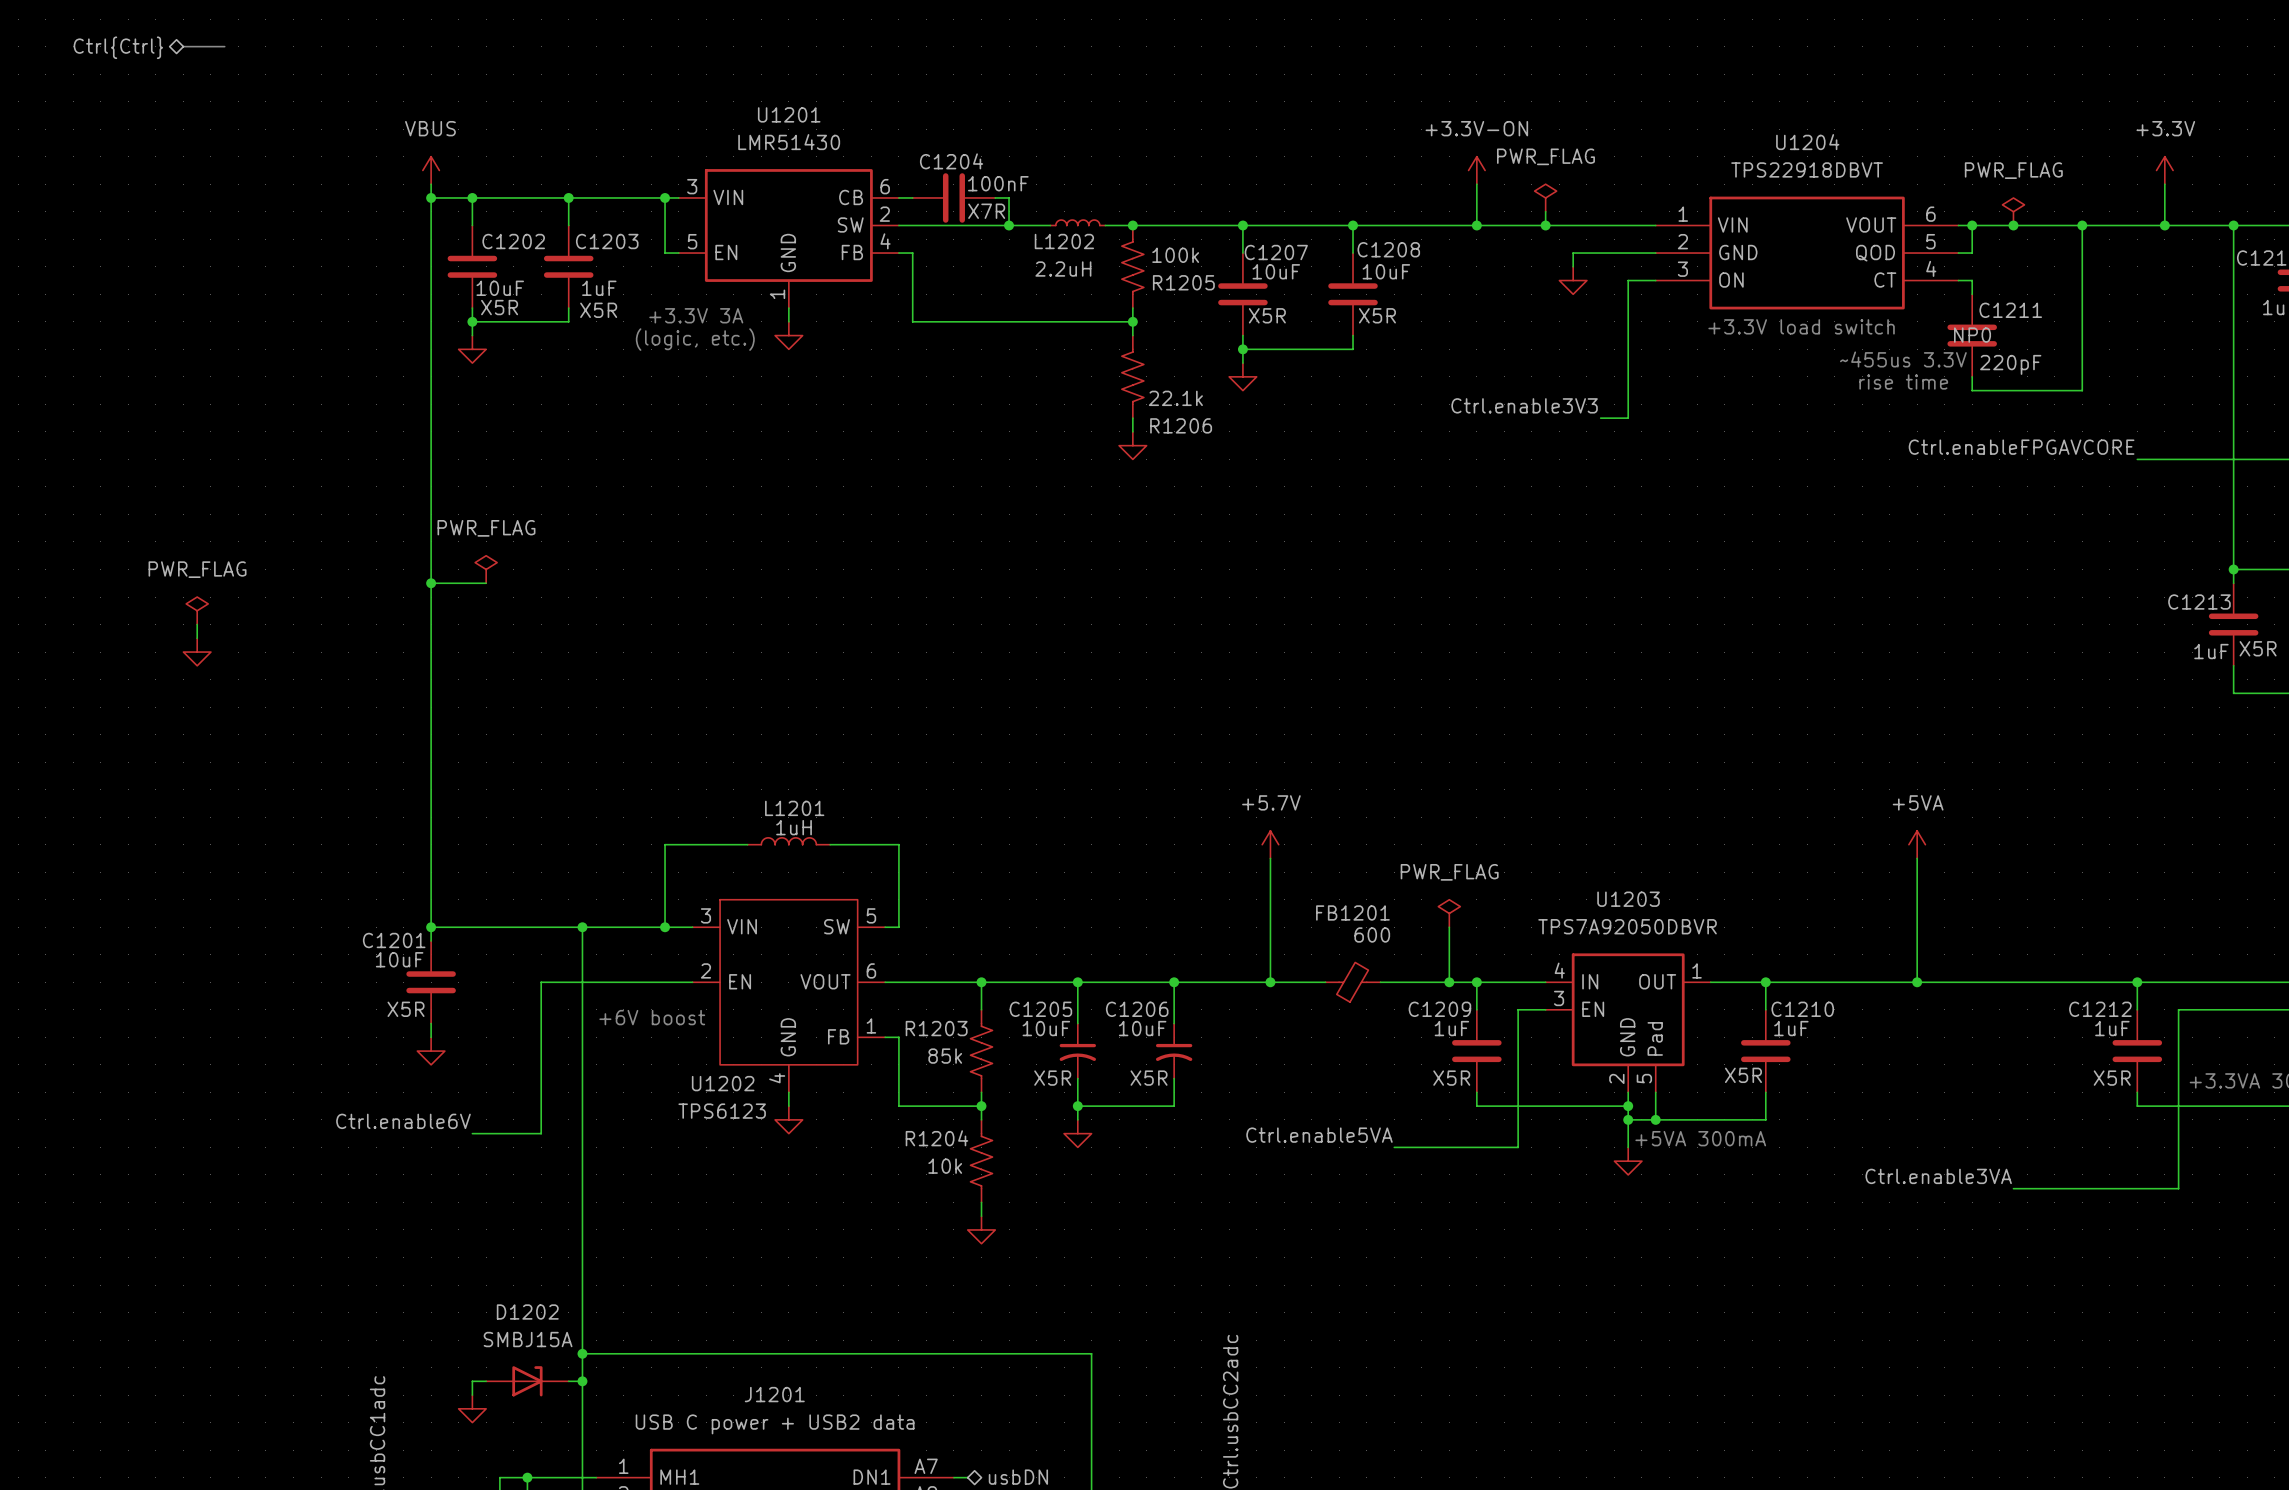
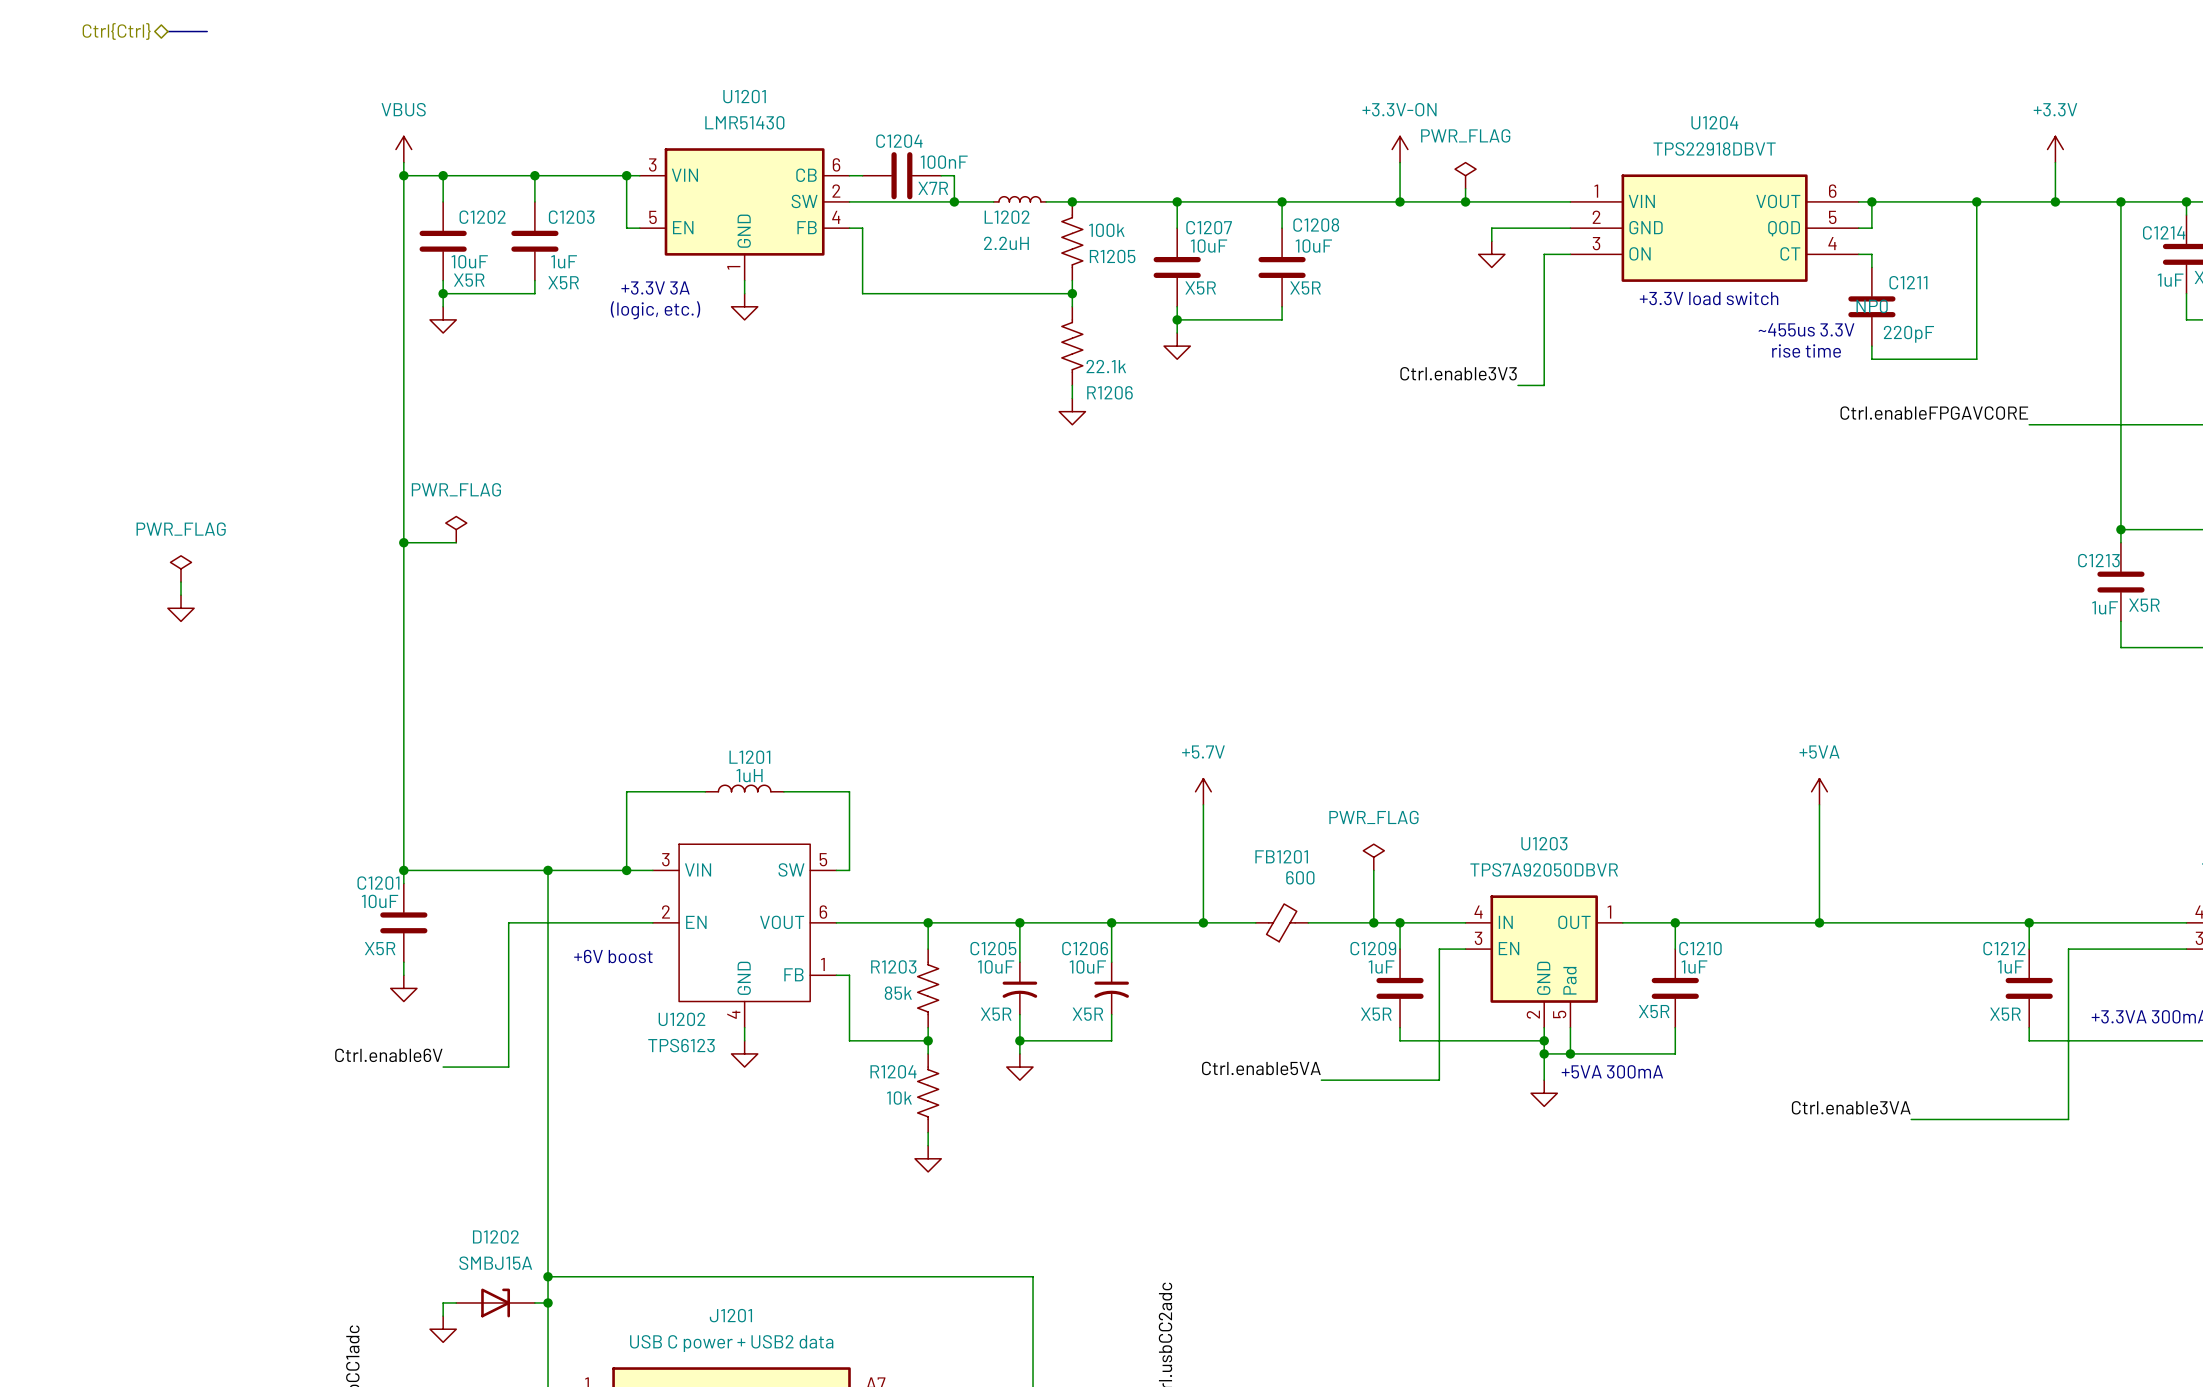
power symbol: PWR_FLAG (2013, 211) -> none
junction: (2013, 225) -> none

